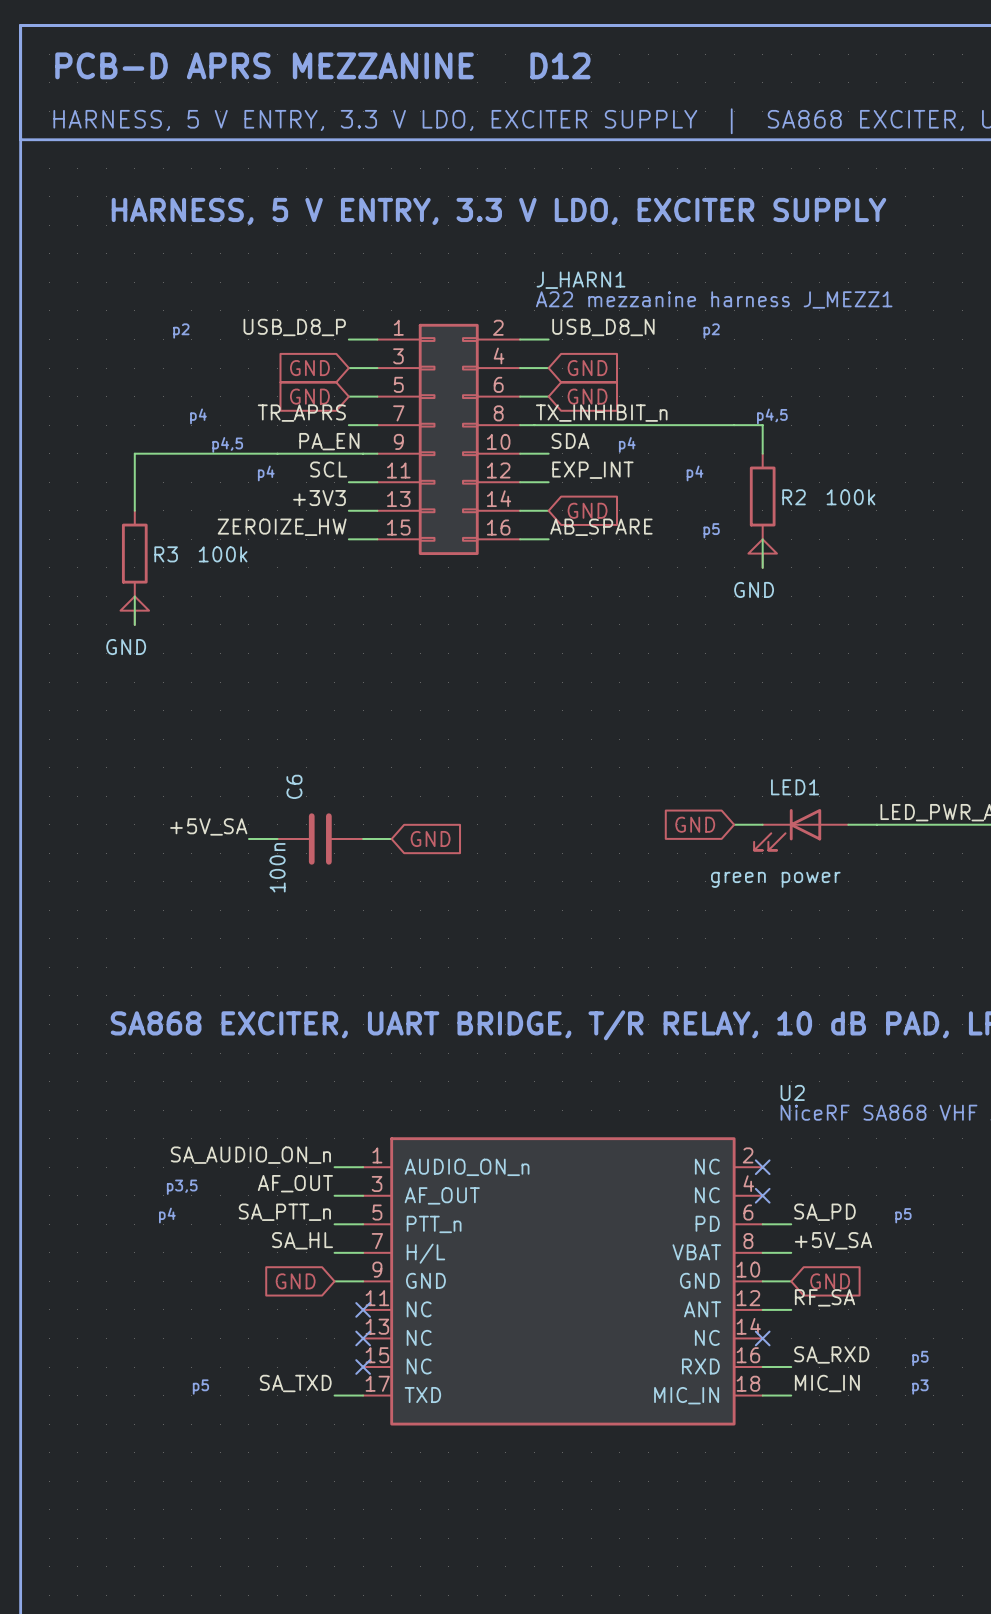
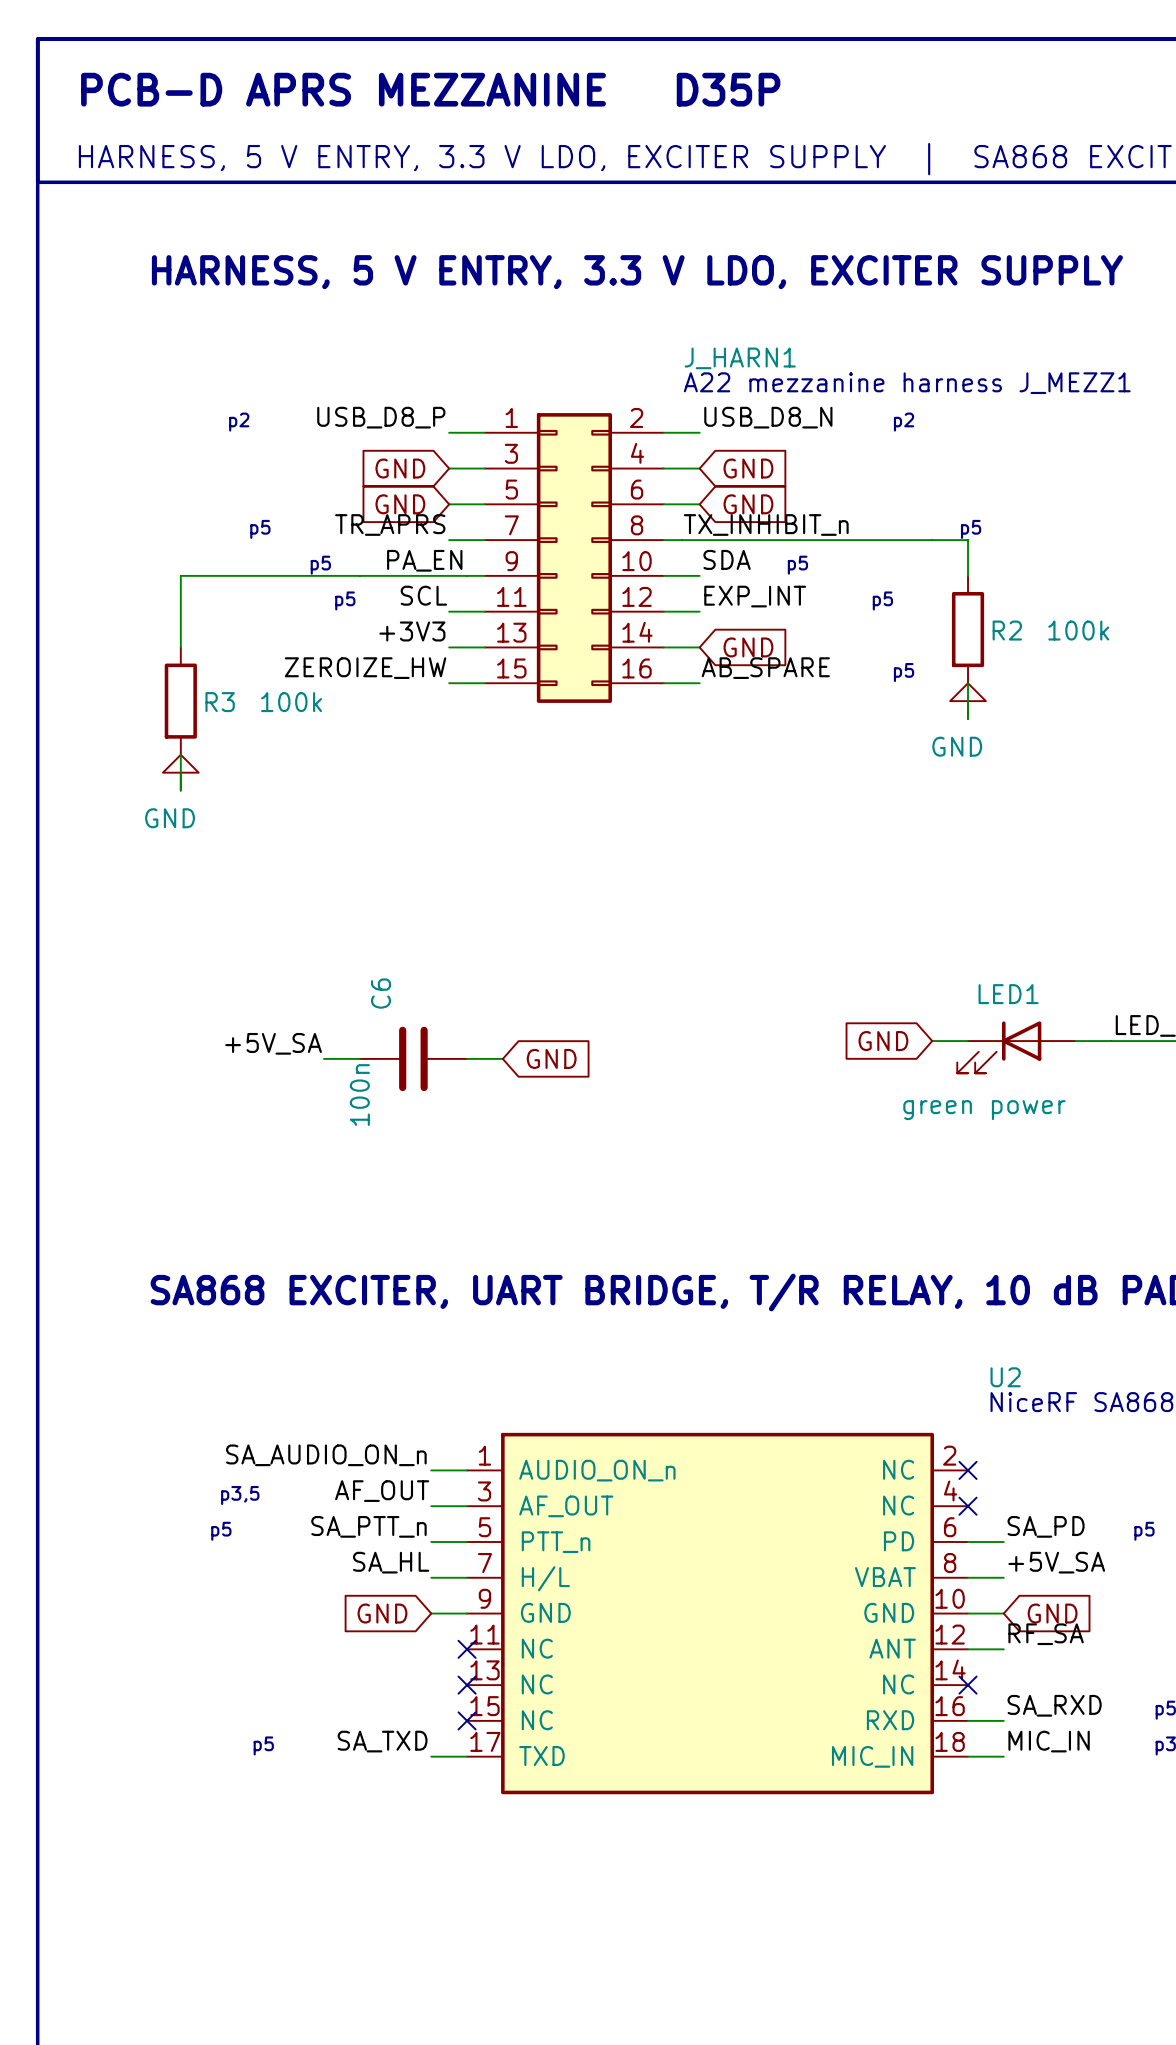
text: PCB-D APRS MEZZANINE D12 (322, 65) -> PCB-D APRS MEZZANINE D35P (430, 89)
text: p4 (198, 416) -> p5 (260, 529)
text: p4,5 (772, 416) -> p5 (971, 529)
text: p4,5 (227, 444) -> p5 (320, 565)
text: p4 (627, 444) -> p5 (797, 565)
text: p4 (266, 473) -> p5 (345, 600)
text: p4 (695, 473) -> p5 (882, 600)
text: p4 (167, 1215) -> p5 (221, 1531)

